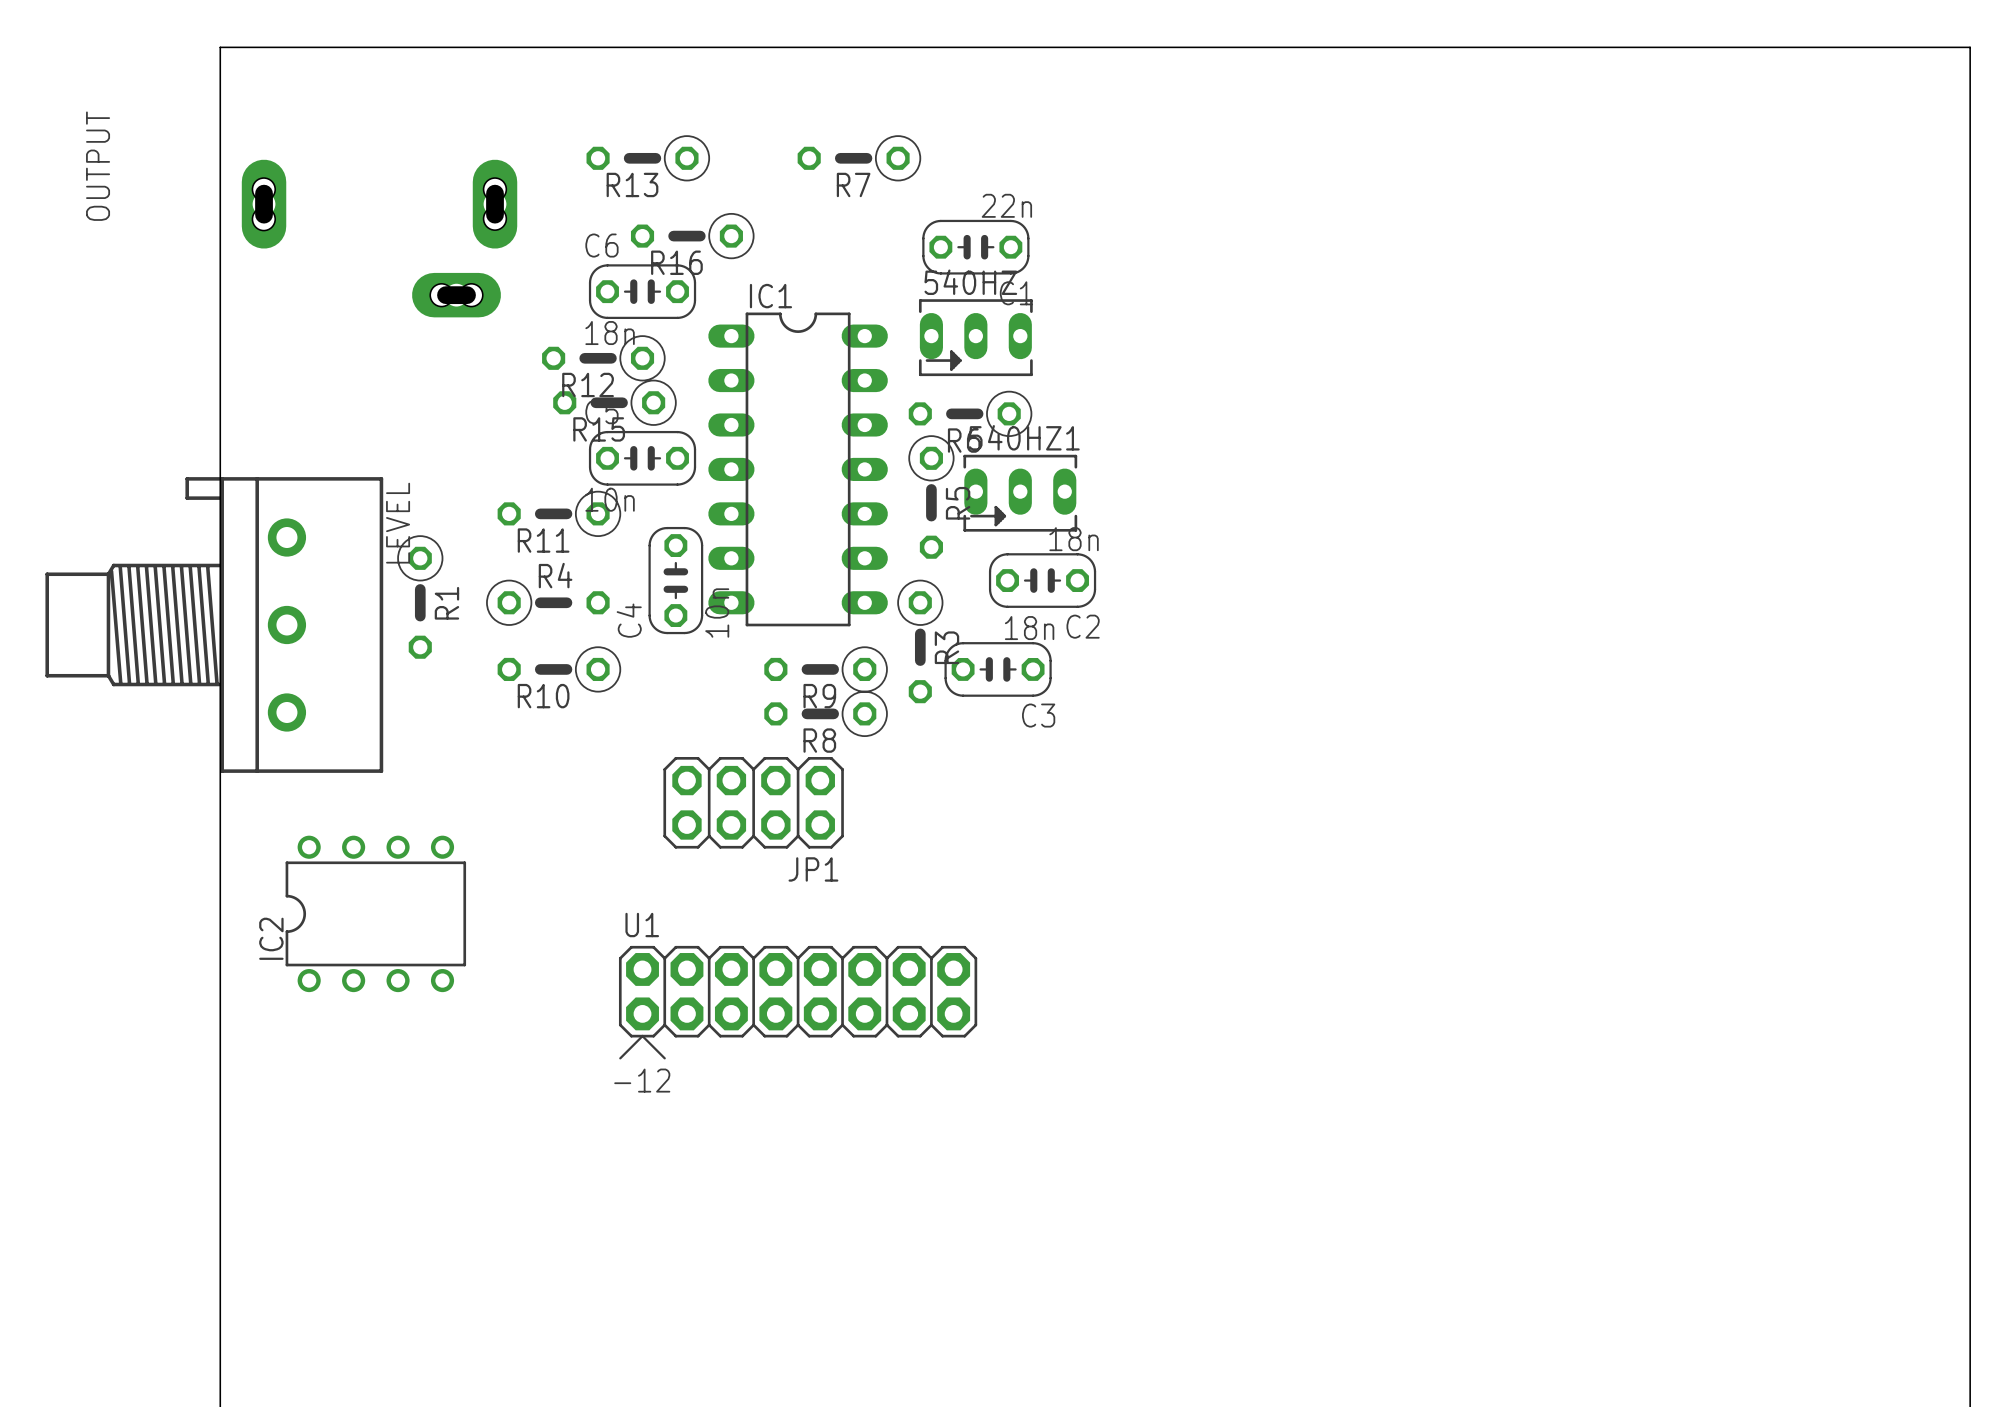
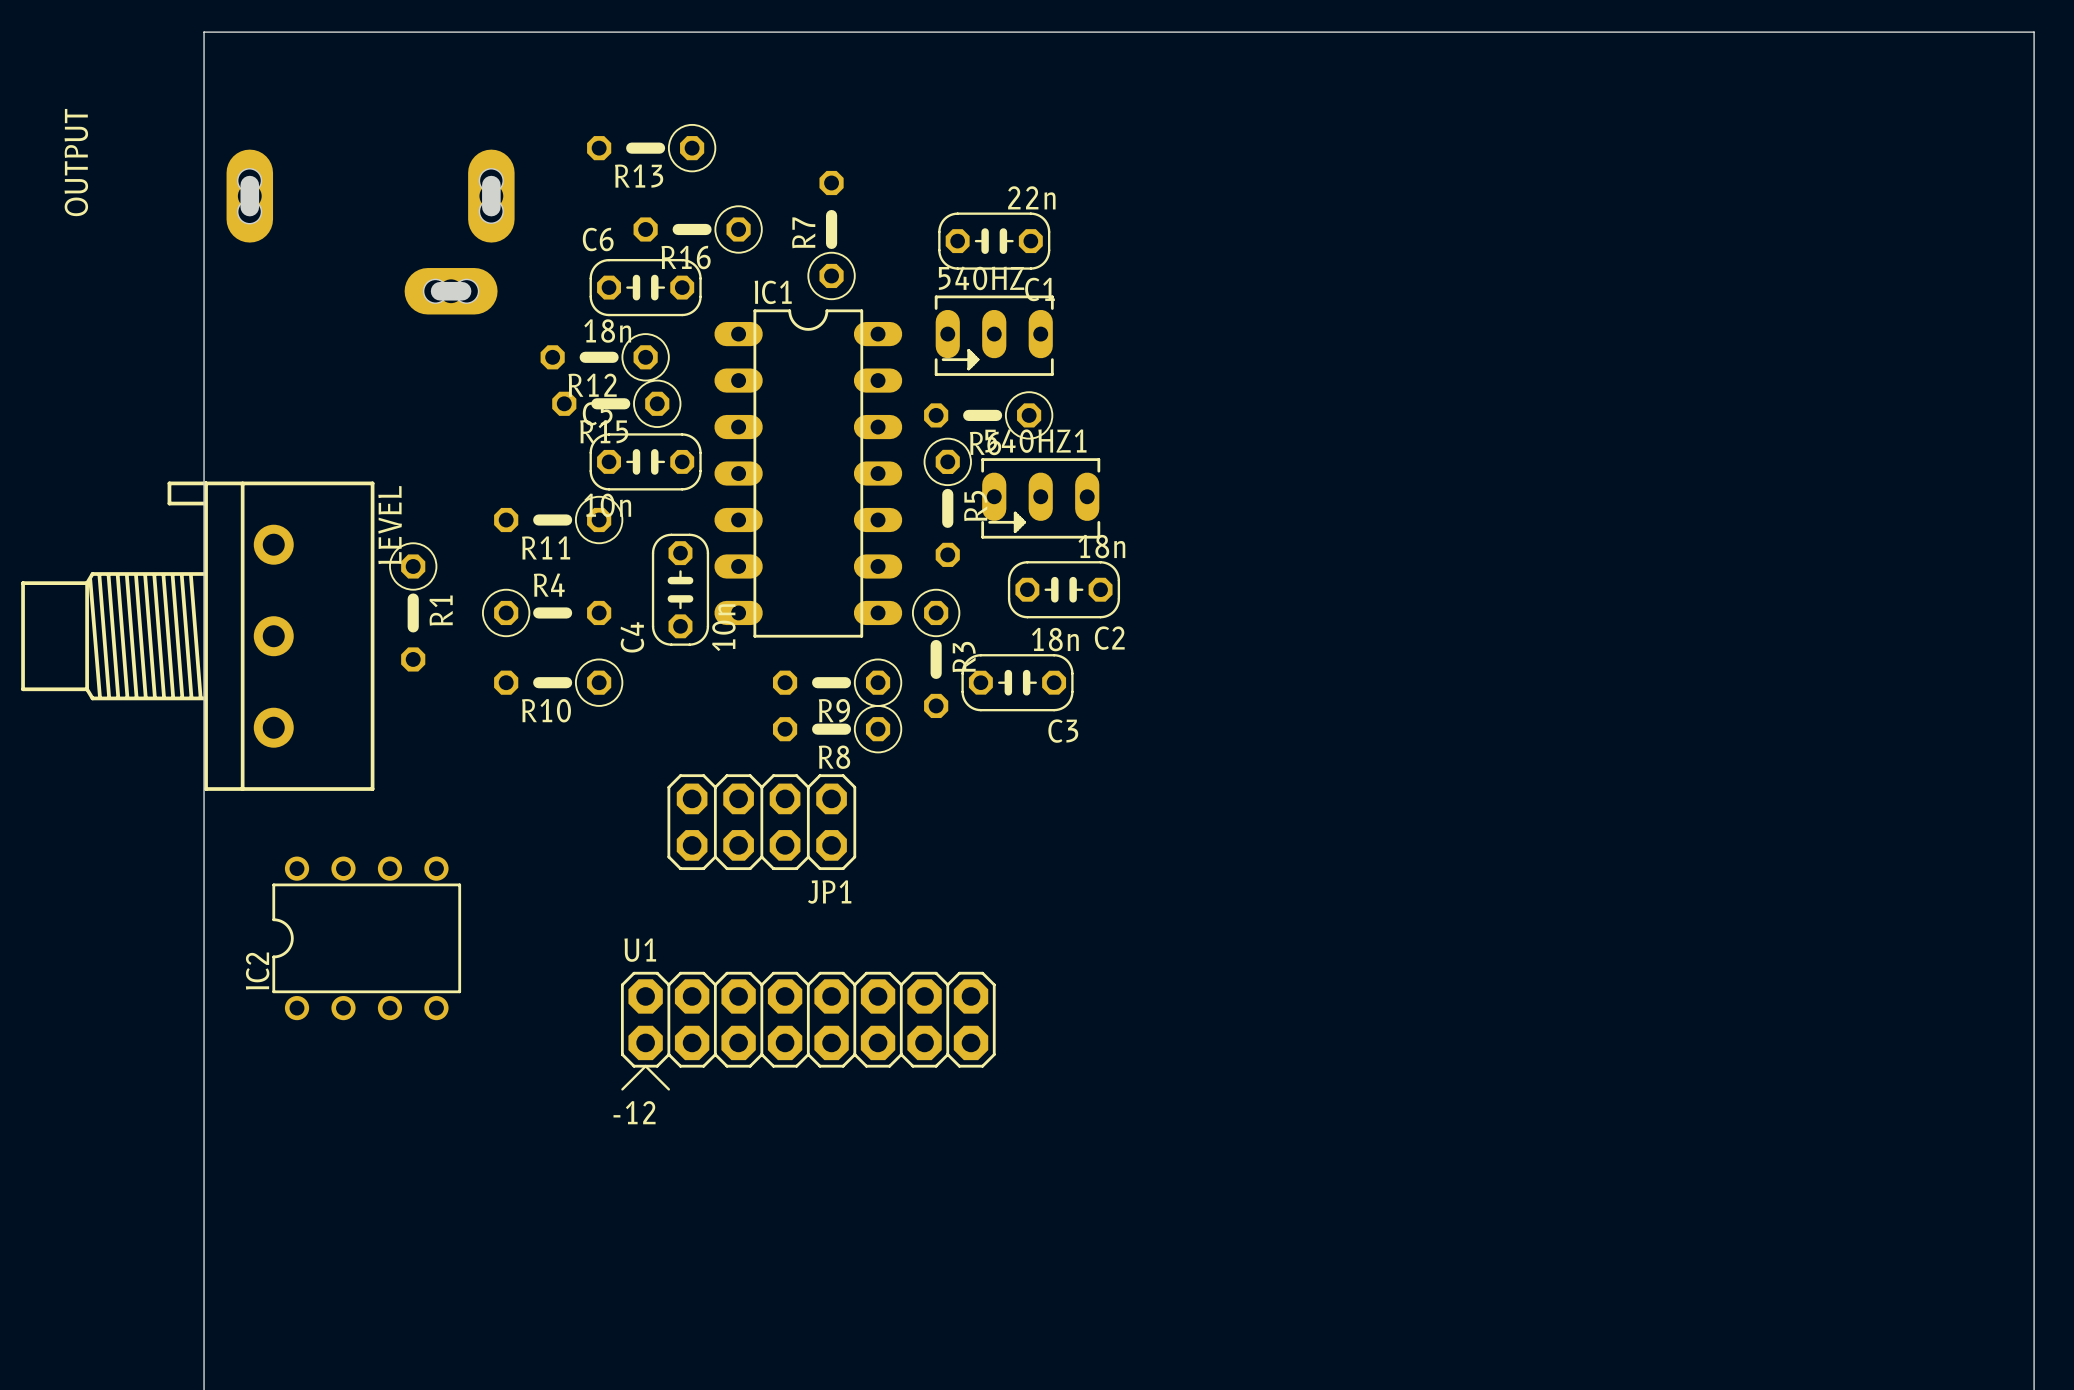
R7 rotation: 0° (859, 158) -> 90° clockwise (831, 235)
R7 position: (859, 158) -> (831, 235)

